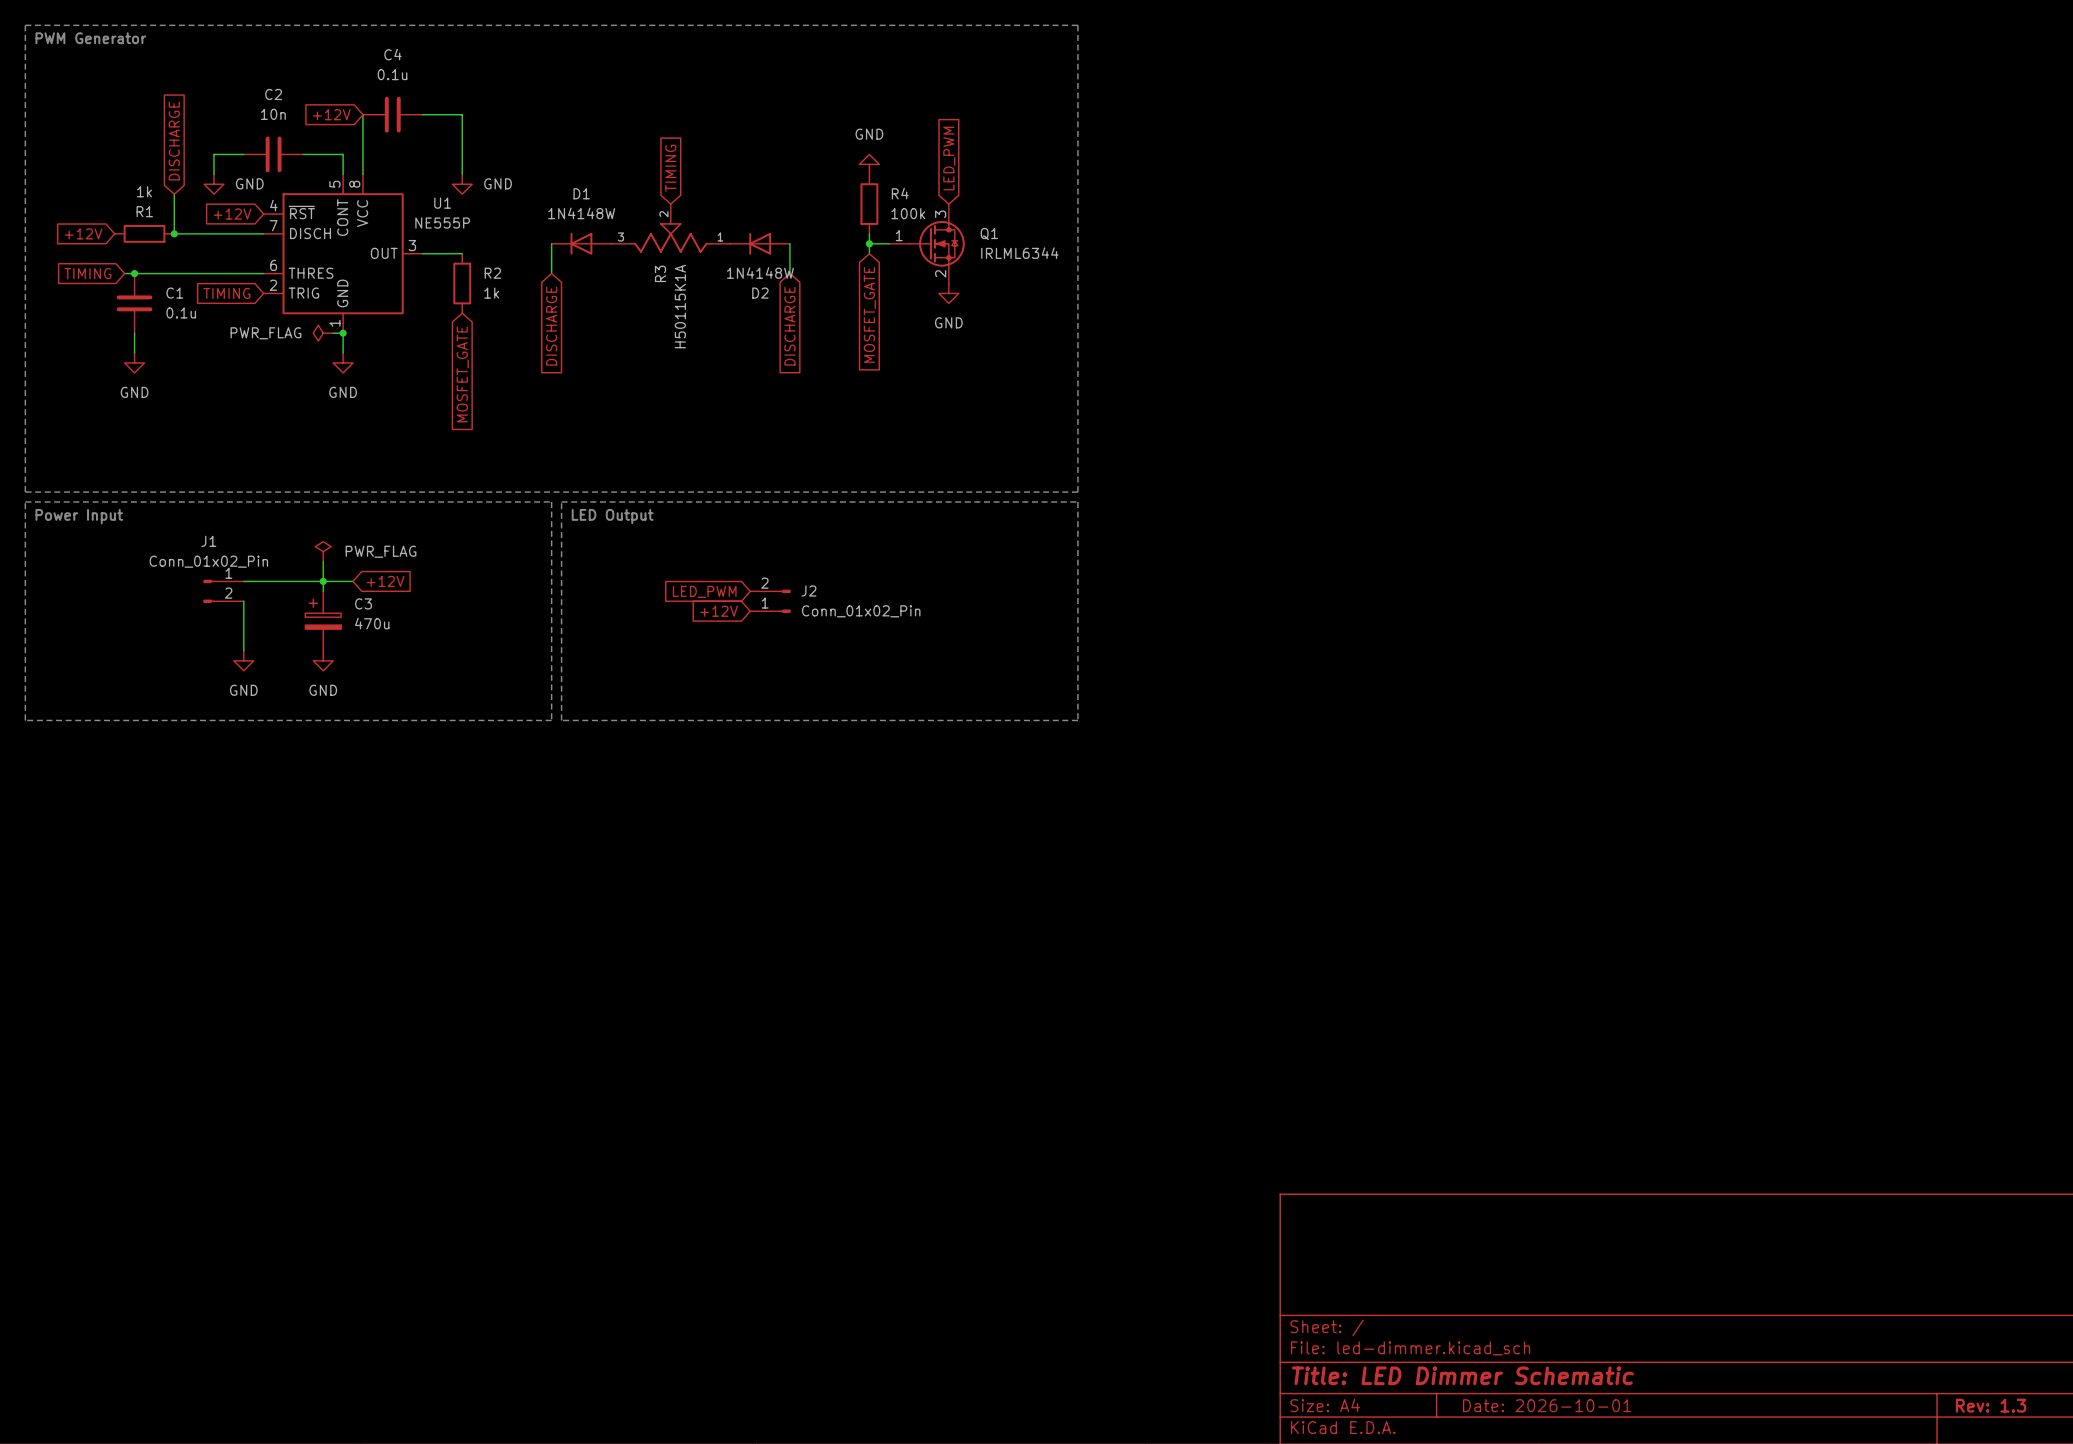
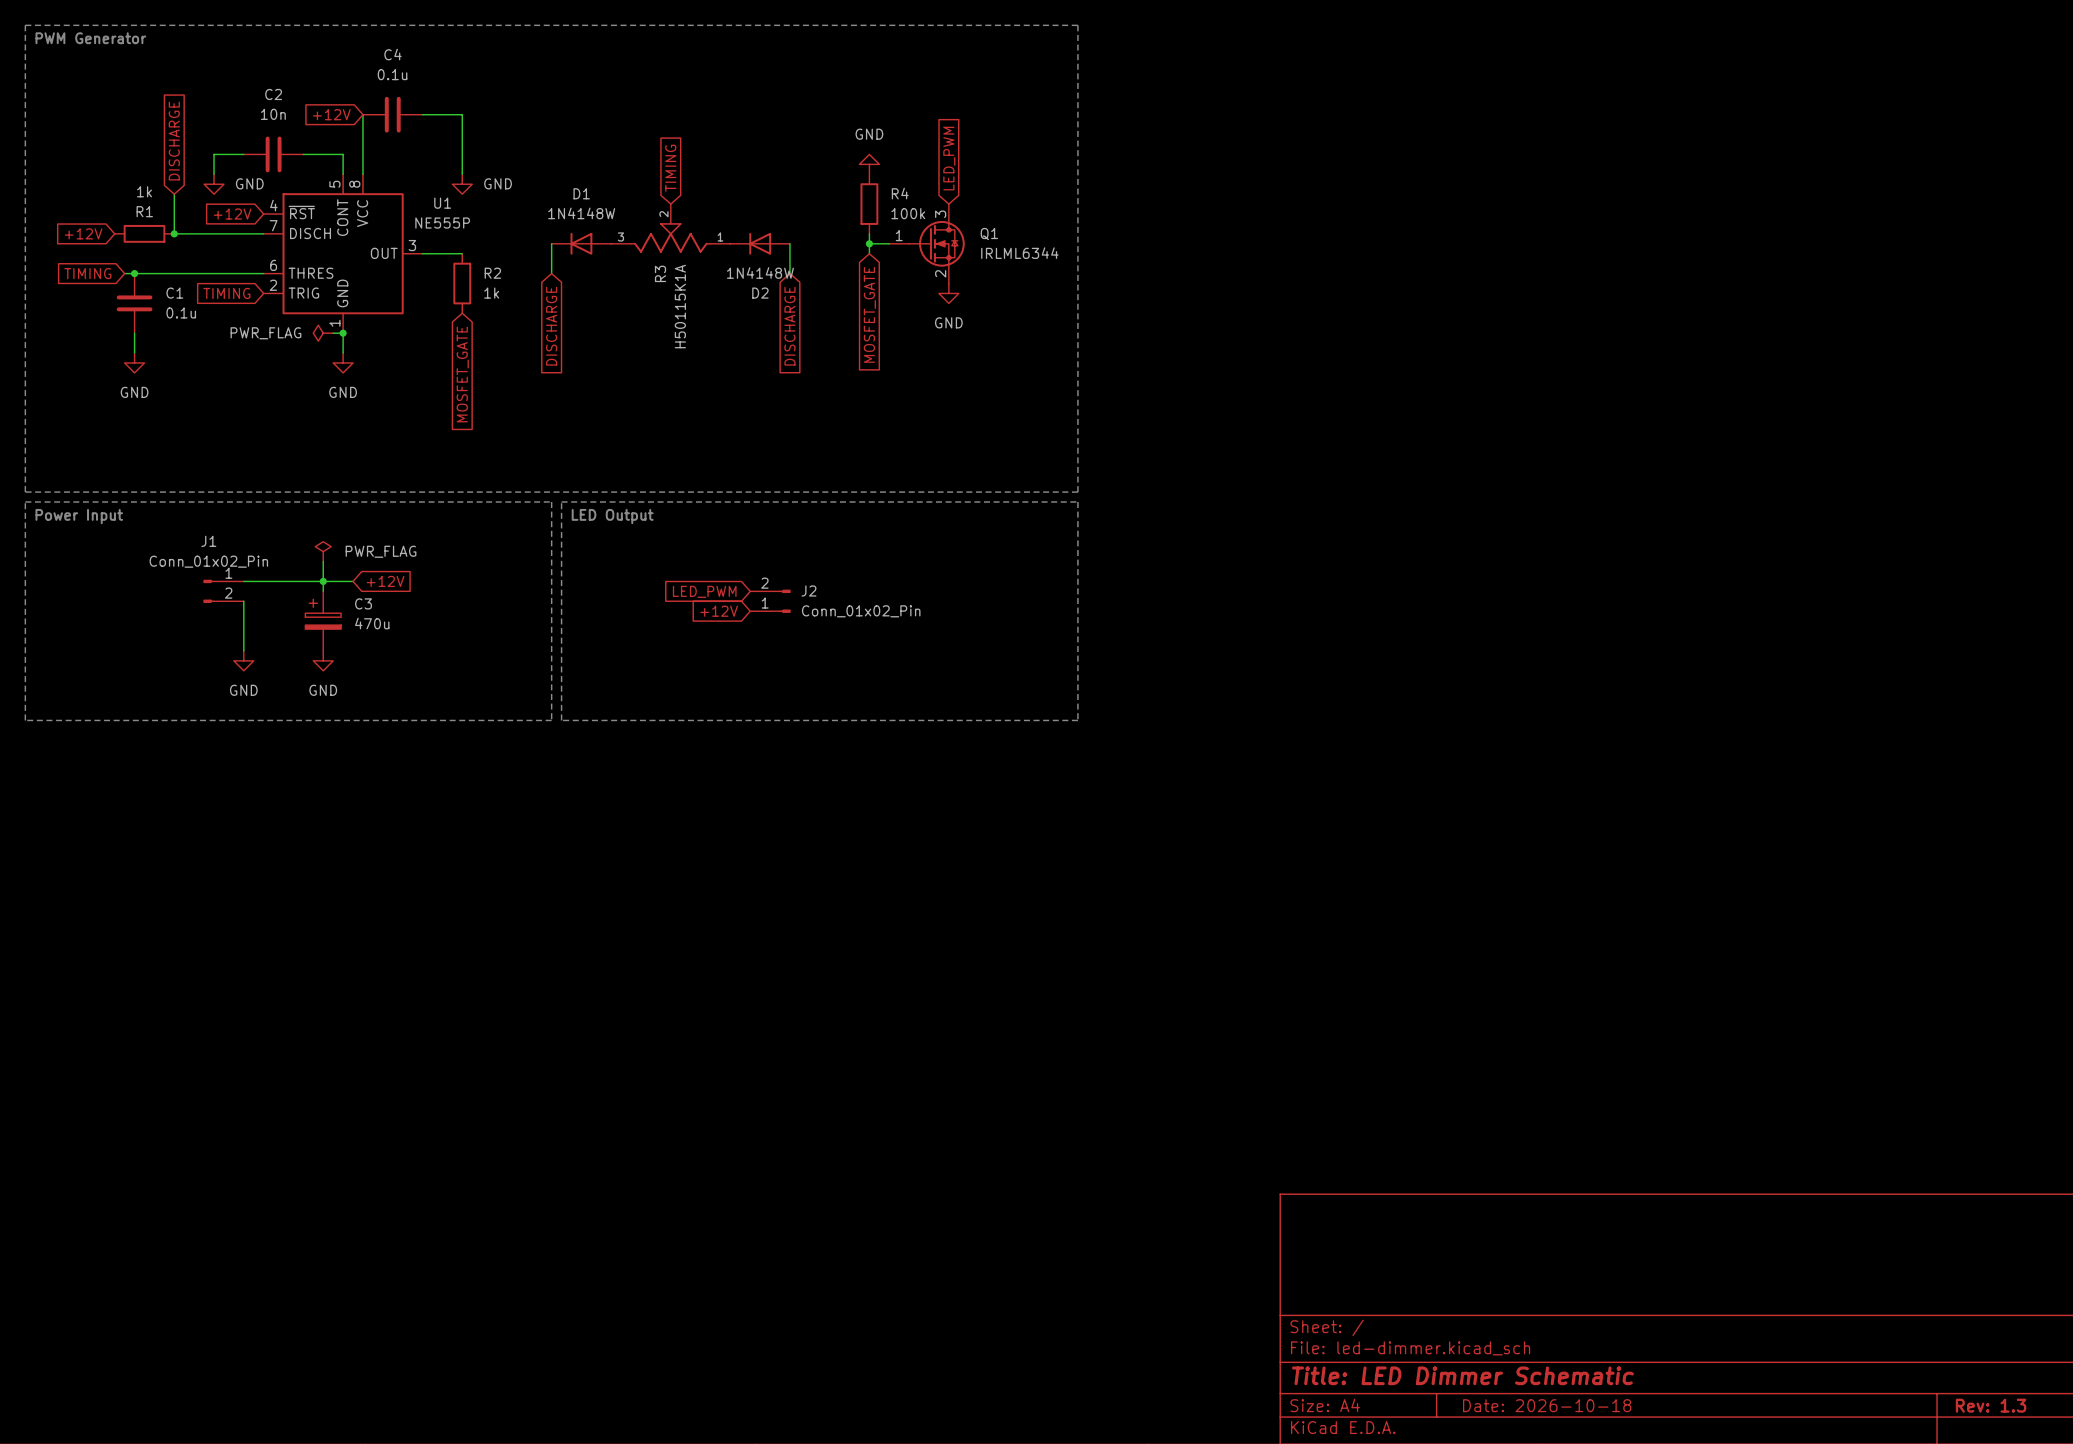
title block: Date: 2026-10-01 (1547, 1405) -> Date: 2026-10-18 (1547, 1405)

